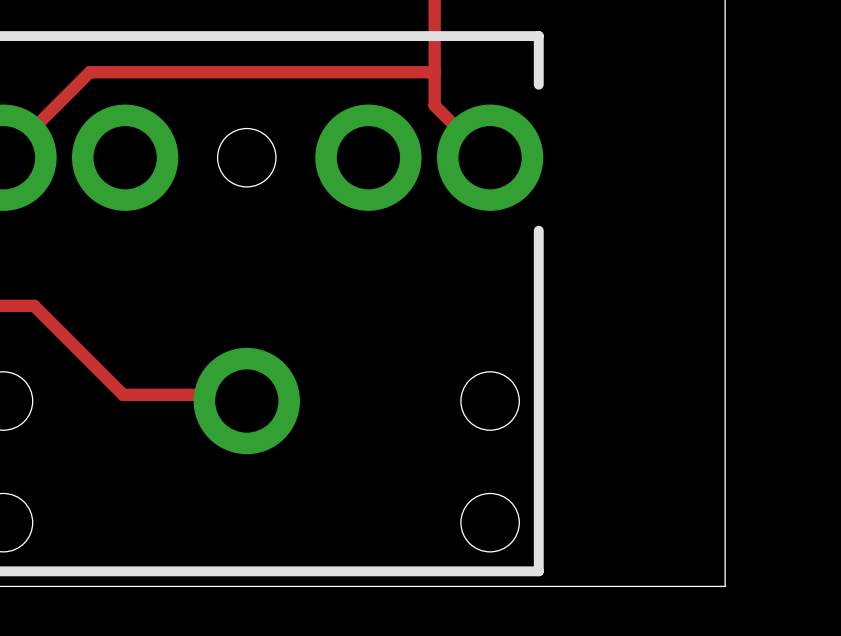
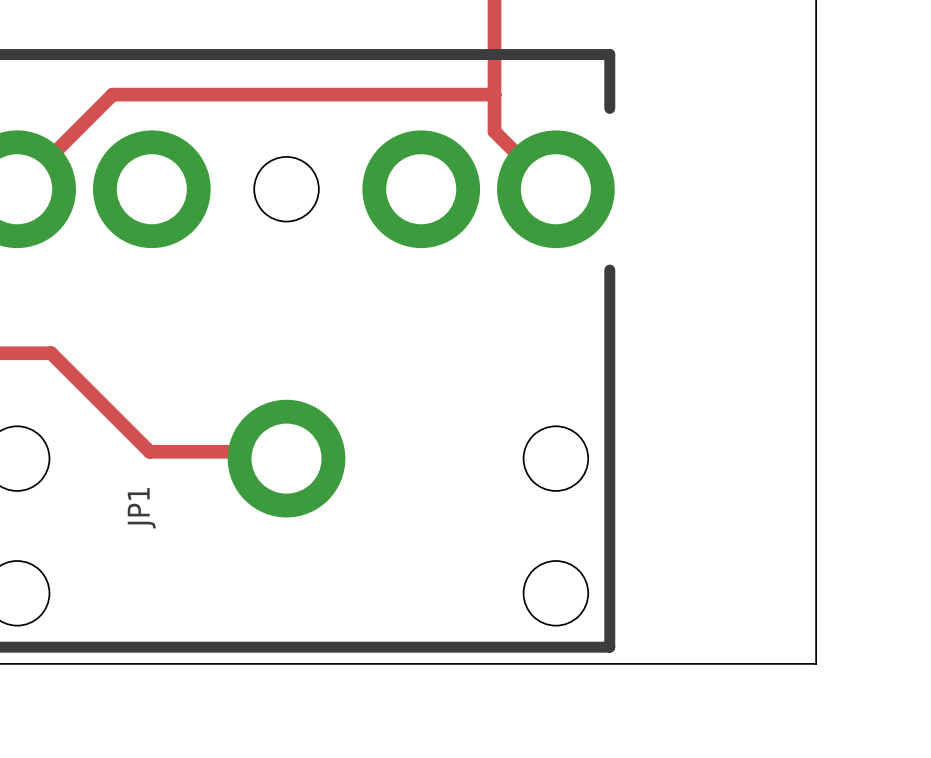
JP1 name: none -> JP1 (141, 508)

